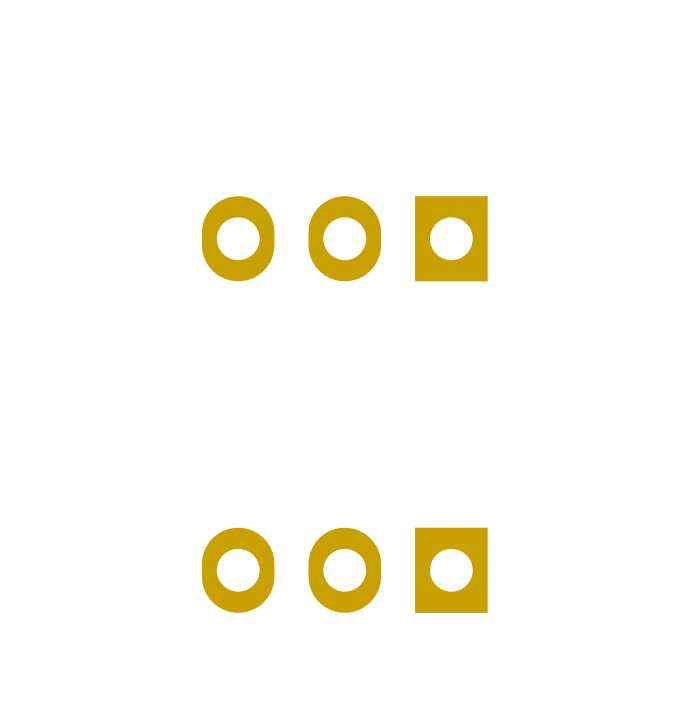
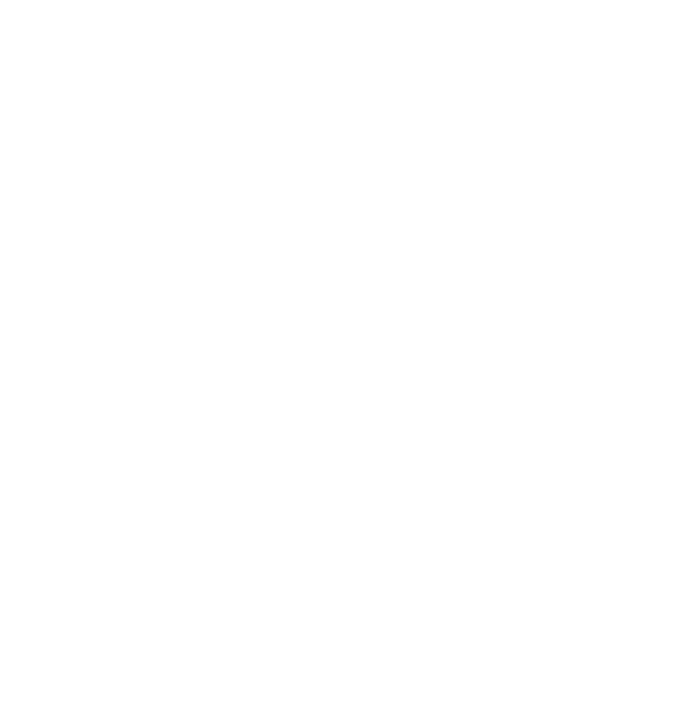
part: (344, 238) -> none
part: (344, 570) -> none

